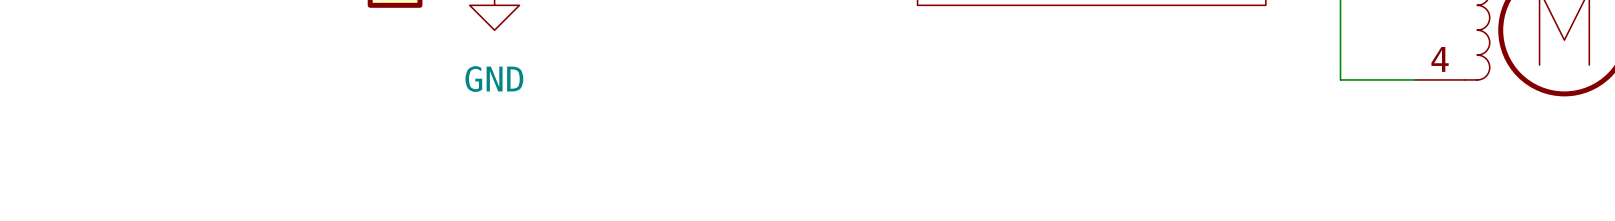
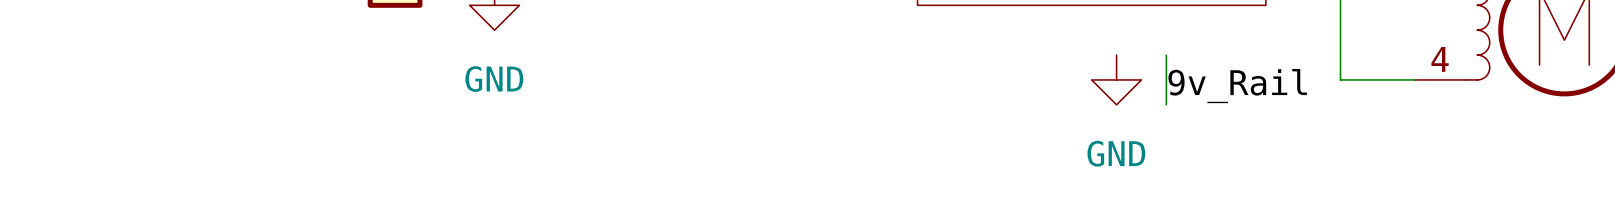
wire: none -> (1166, 55) (1166, 104)
power symbol: none -> GND (1116, 79)
label: none -> 9v_Rail (1237, 86)

